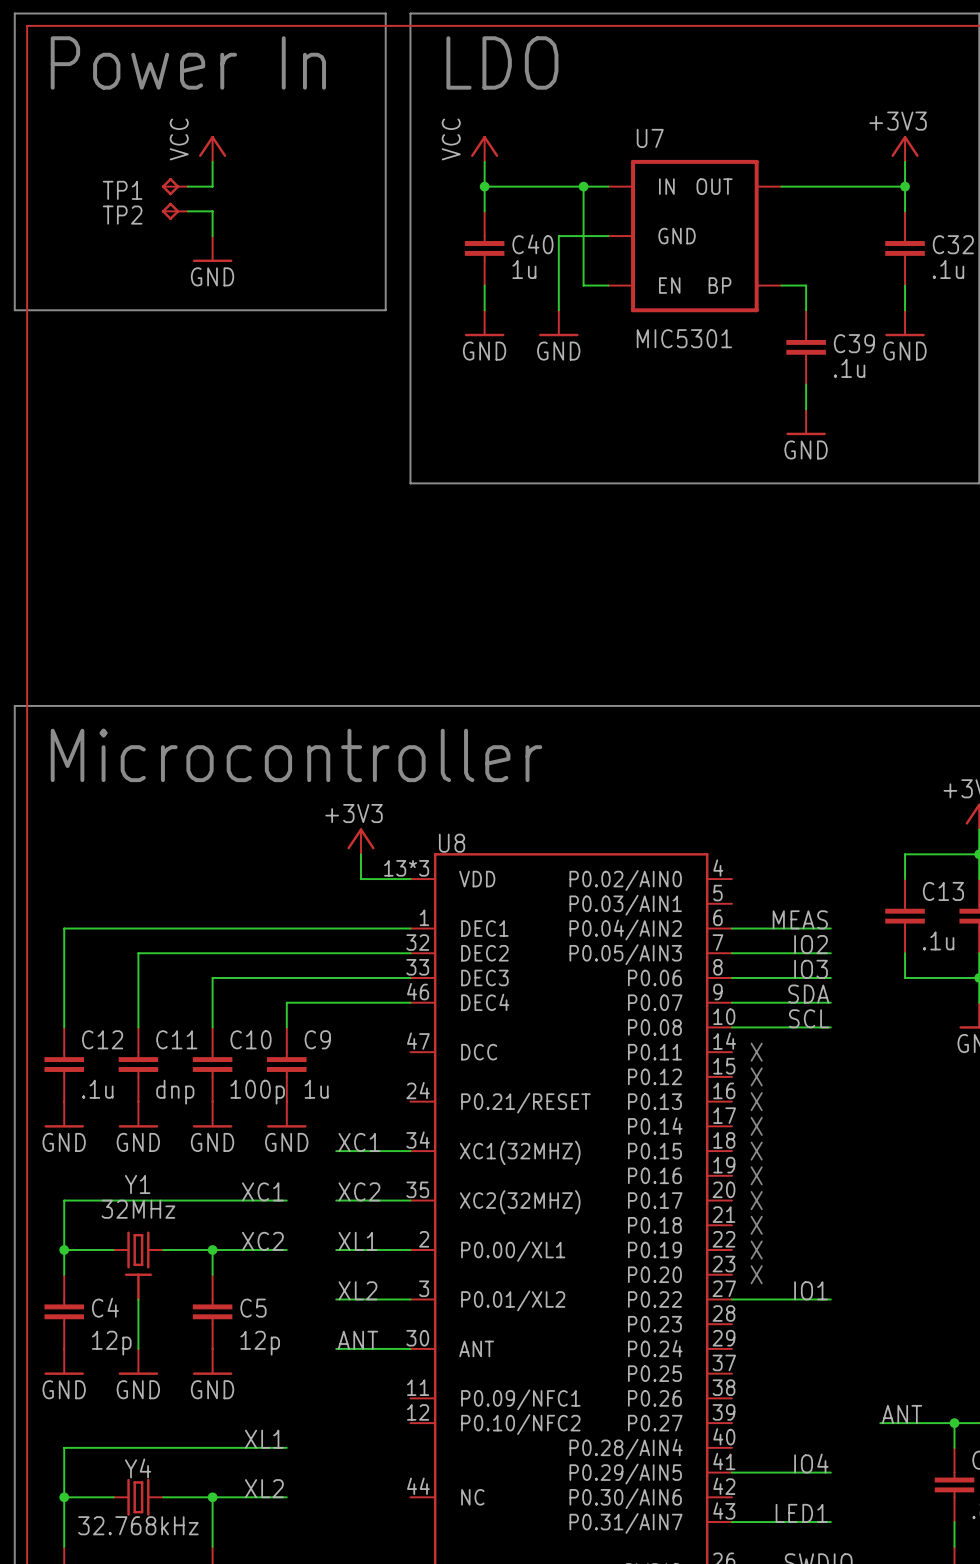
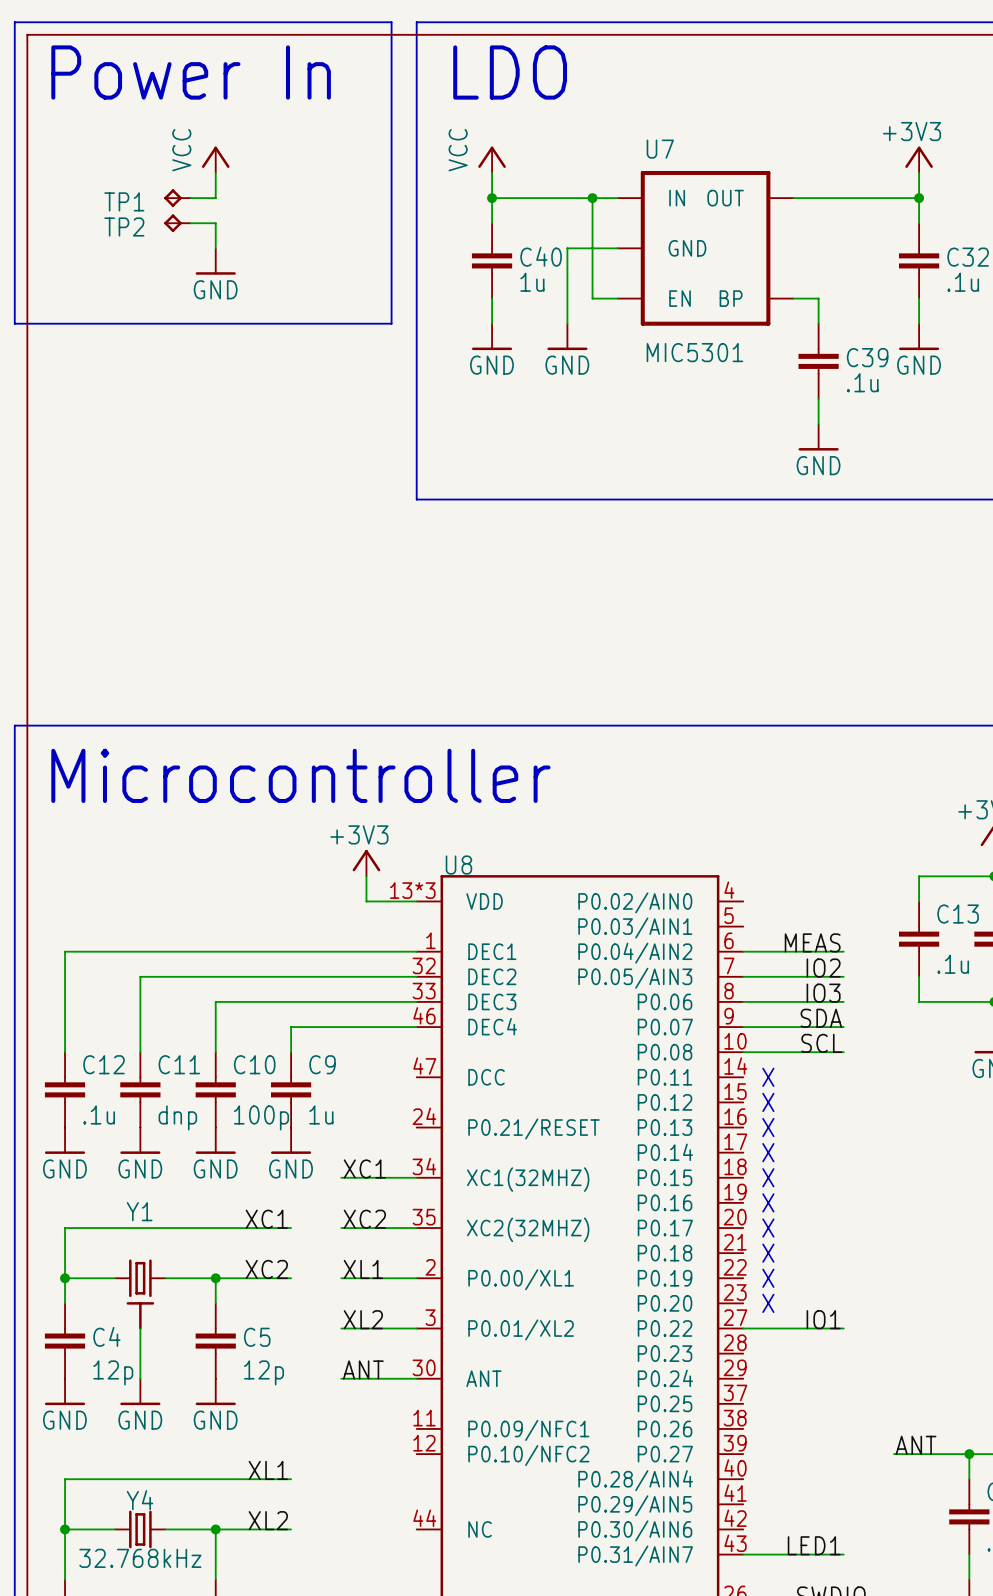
Y1 value: 32MHz (138, 1209) -> none
label: IO4 (811, 1463) -> none
wire: (731, 1472) (830, 1472) -> none

